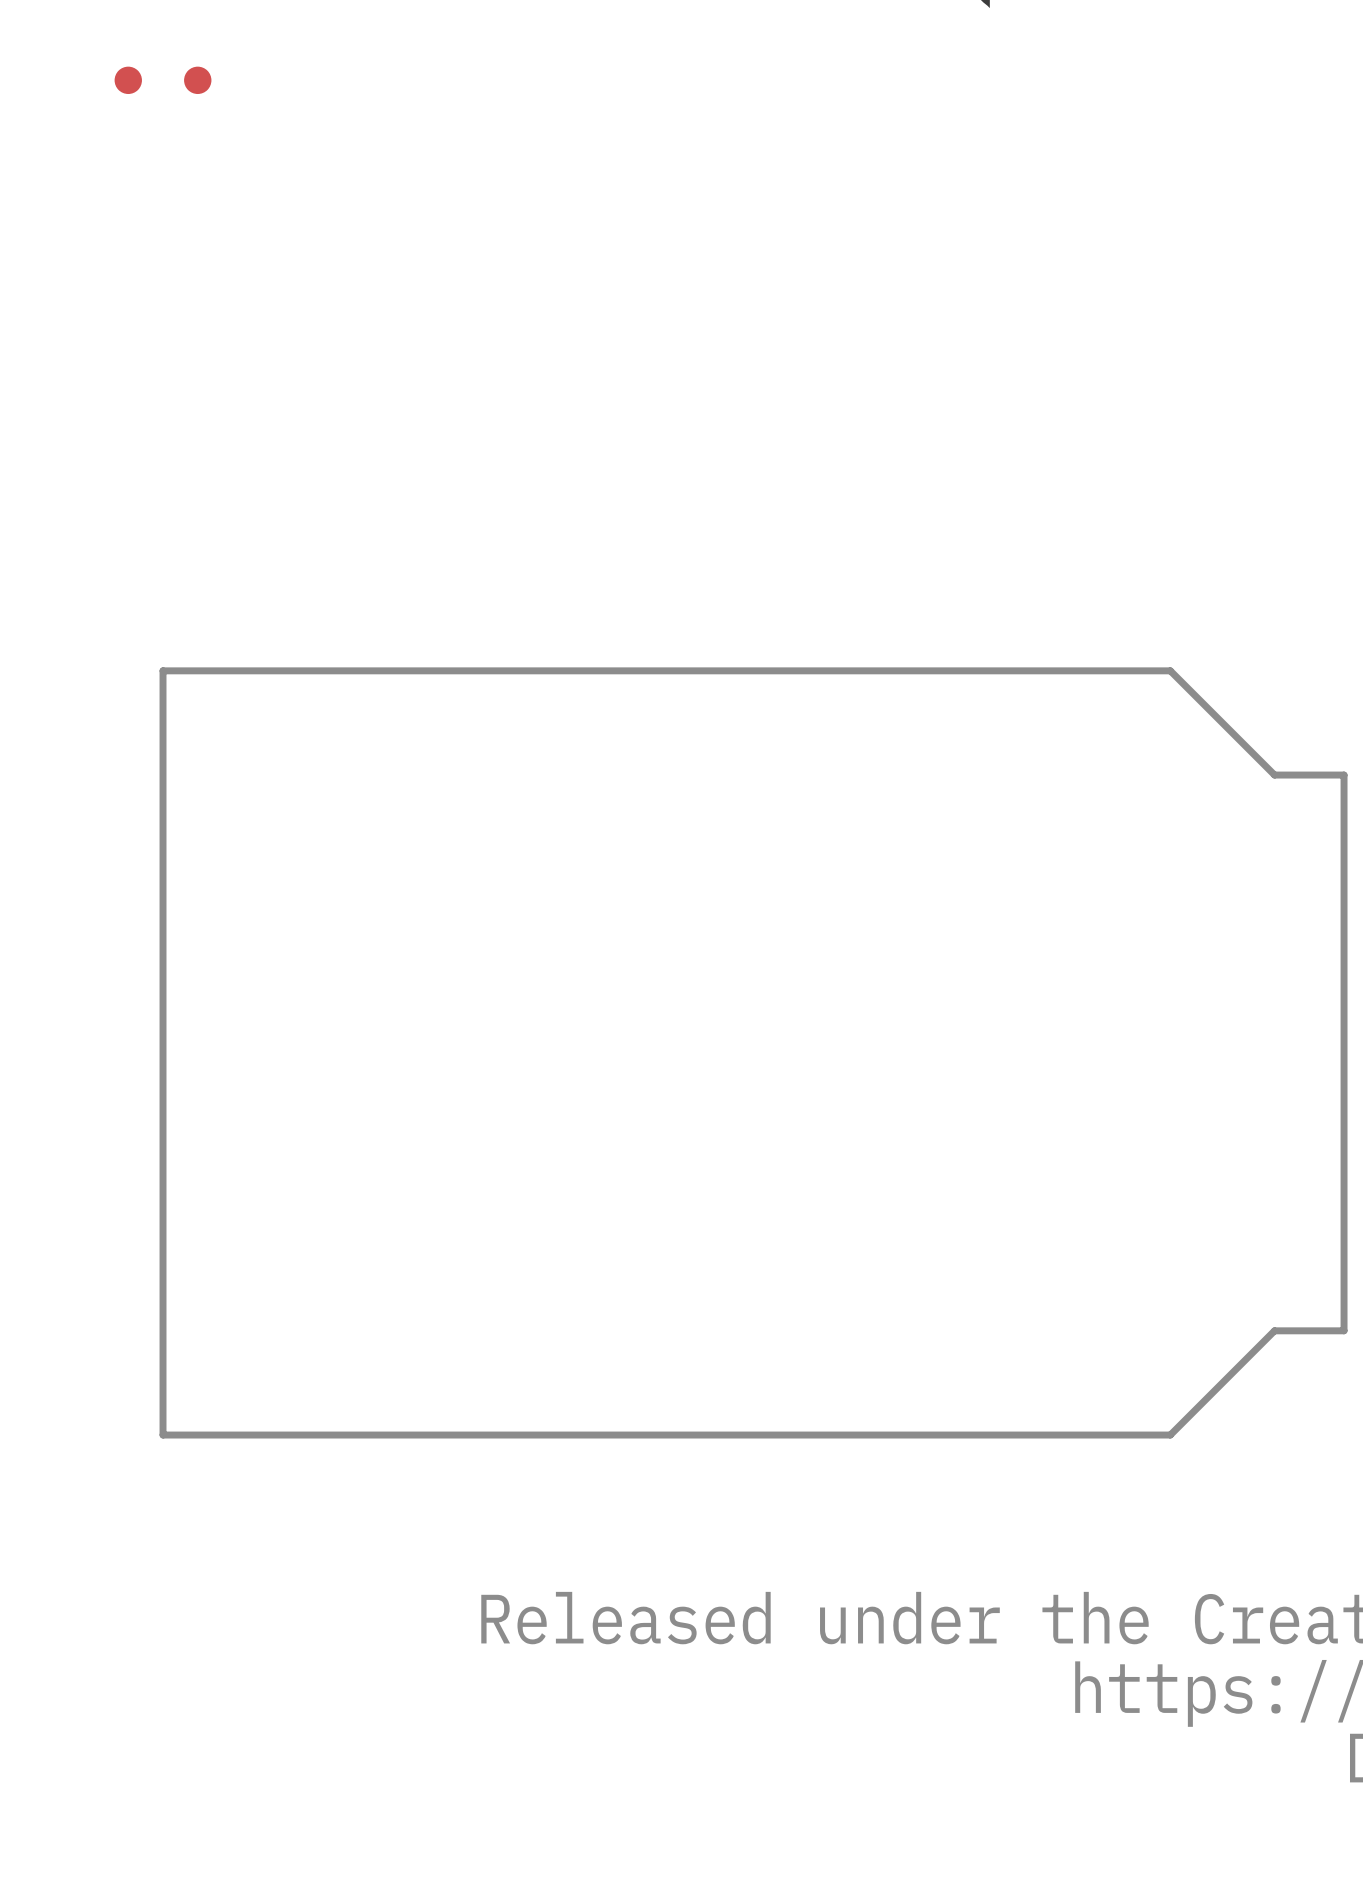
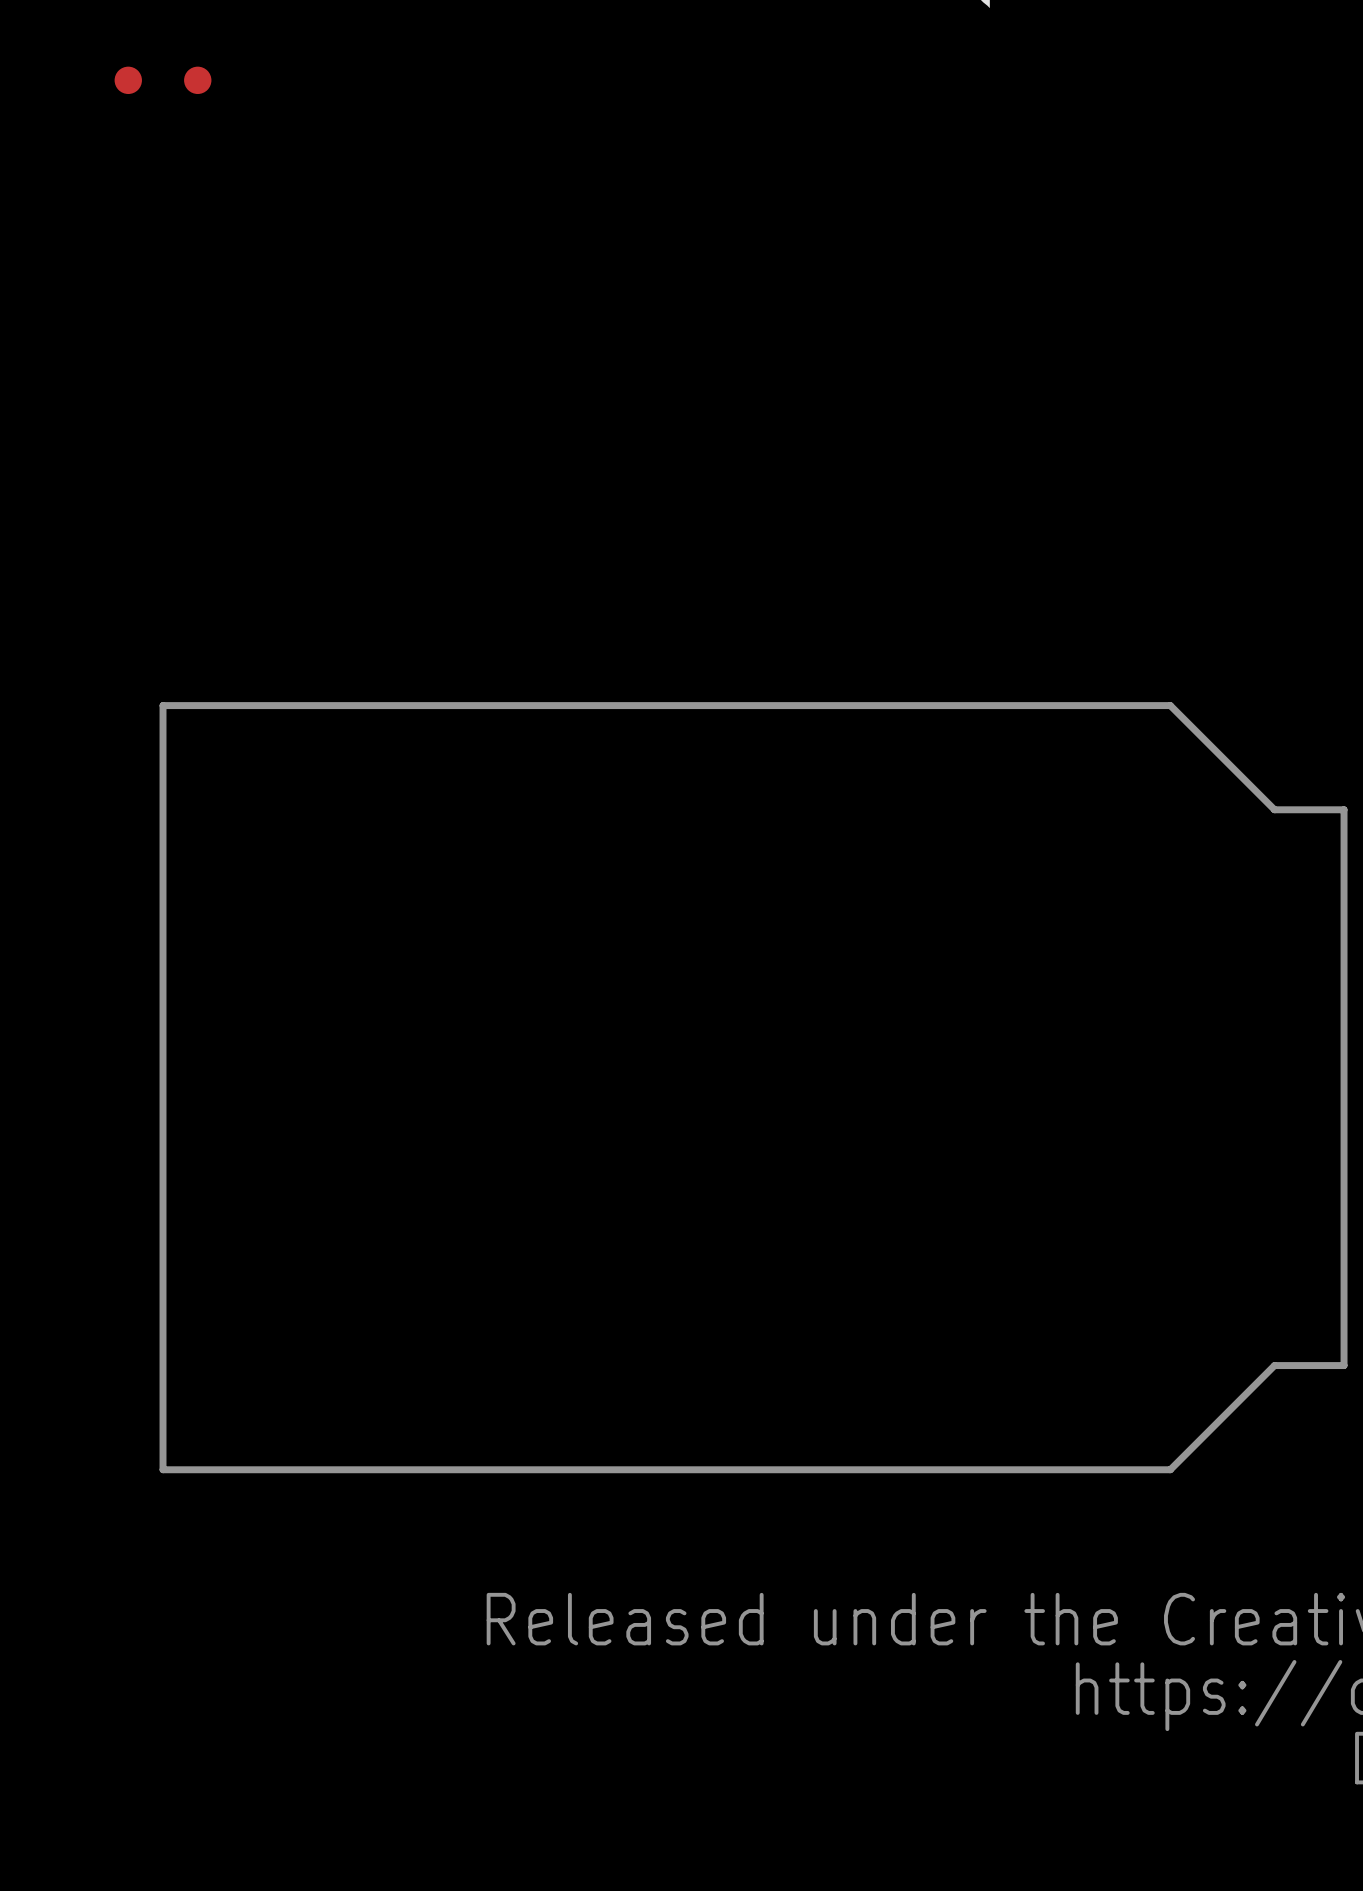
line: (163, 705) (163, 670) (1170, 670) (1274, 775) (1344, 775) (1344, 809) -> (163, 705) (1170, 705) (1274, 809) (1344, 809)
line: (1344, 1330) (1274, 1330) (1170, 1435) (163, 1435) -> (1344, 1330) (1344, 1365) (1274, 1365) (1170, 1469) (163, 1469) (163, 1435)

